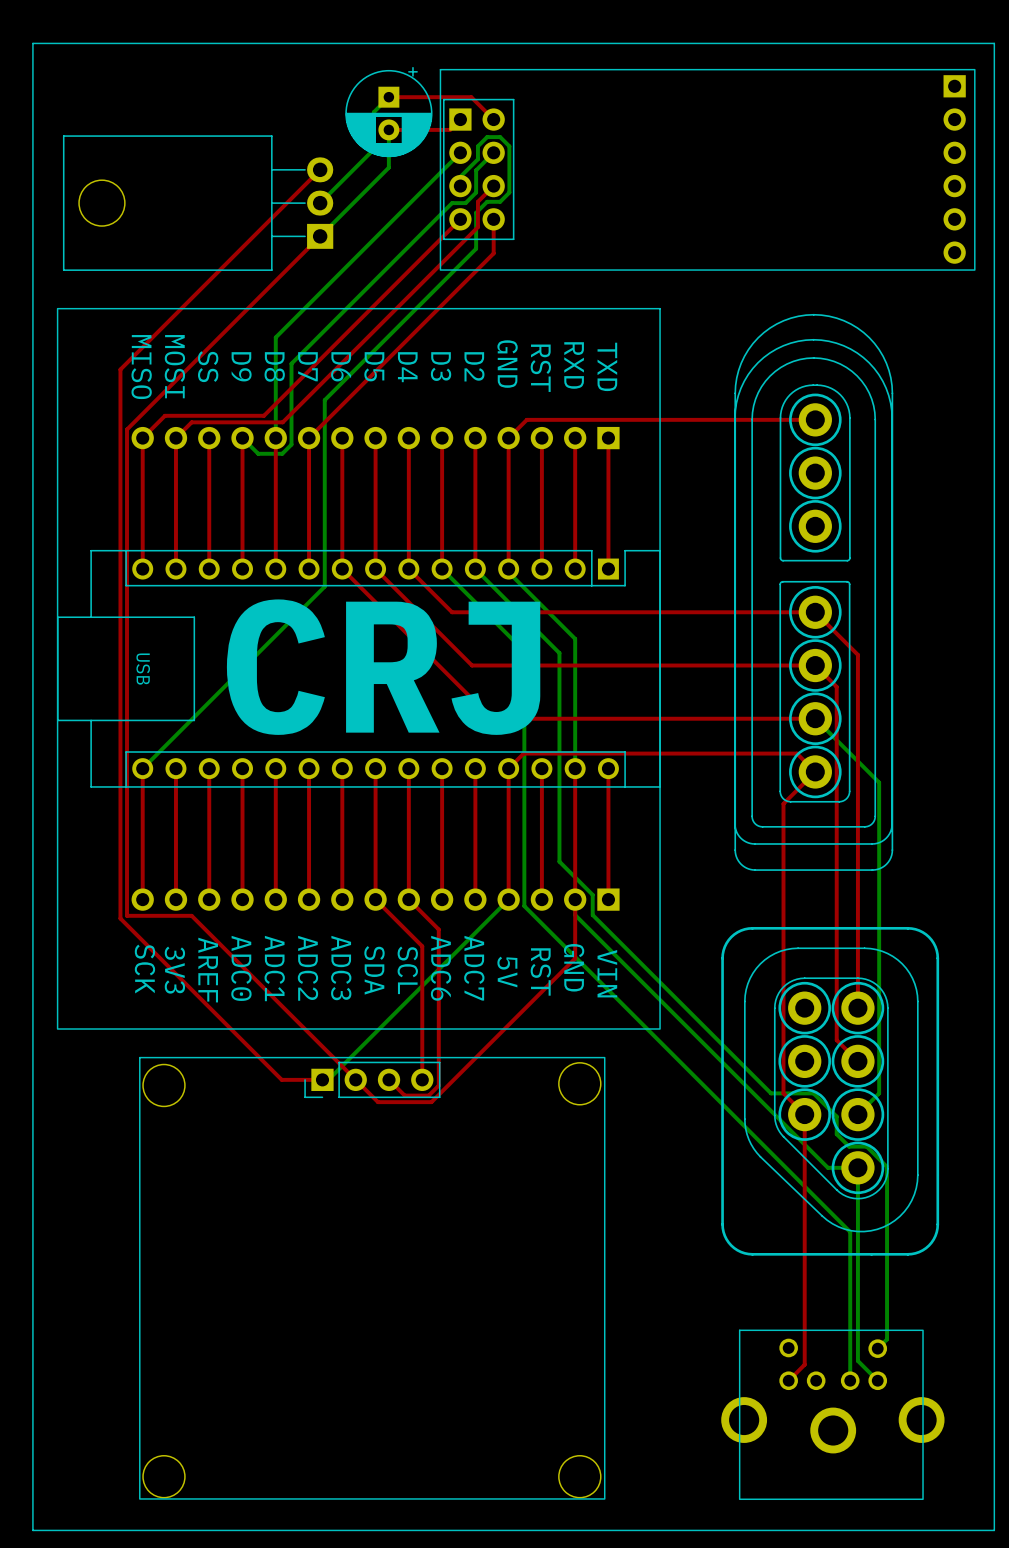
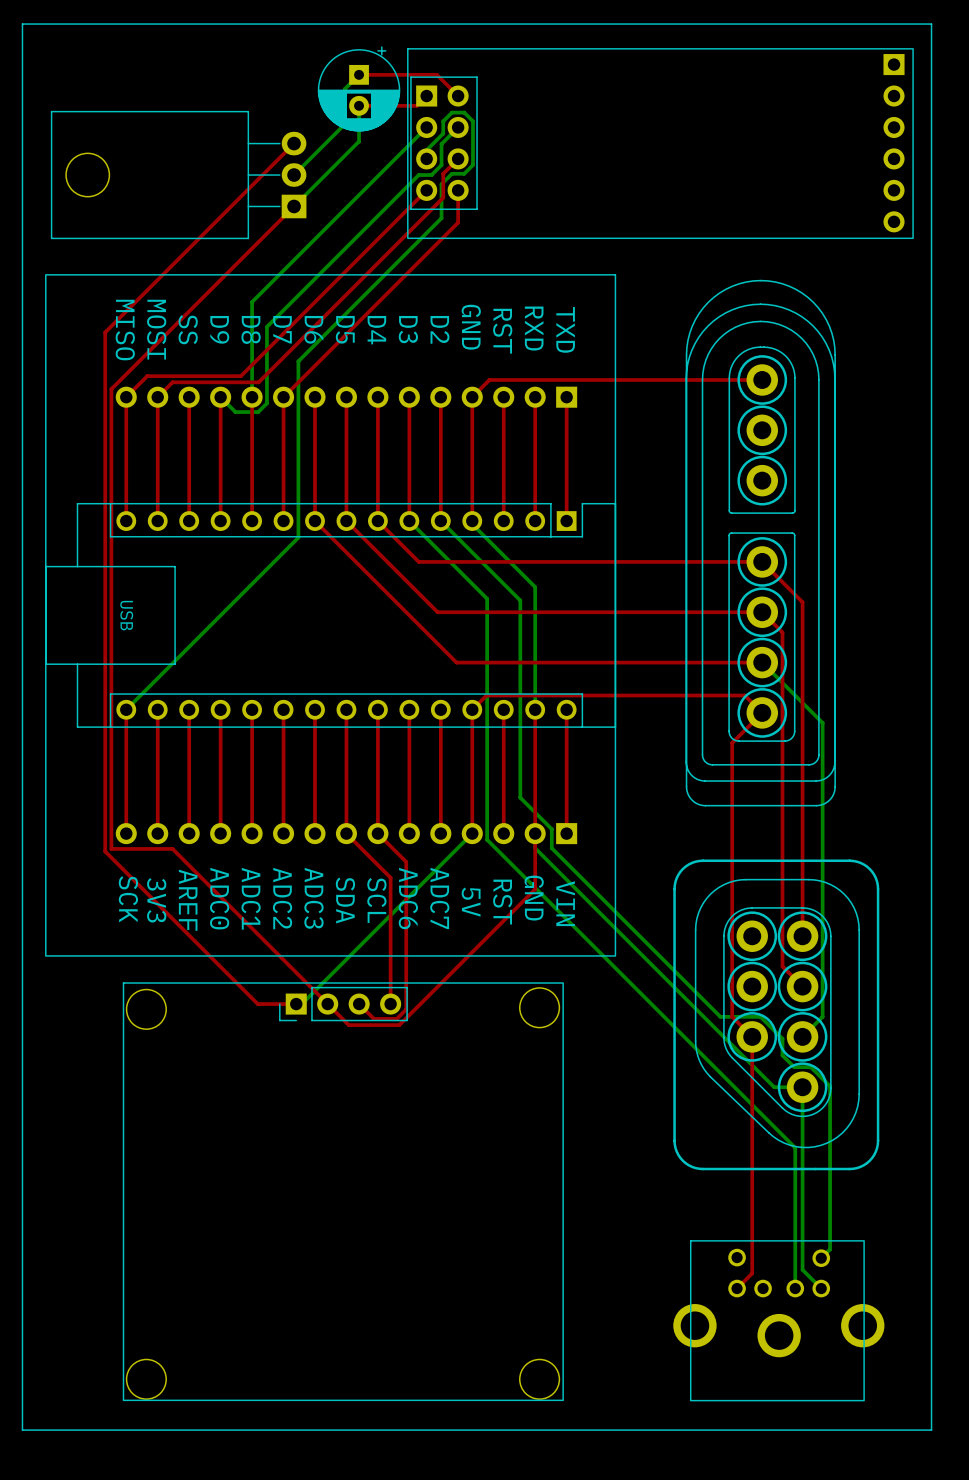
text: CRJ (383, 667) -> none

